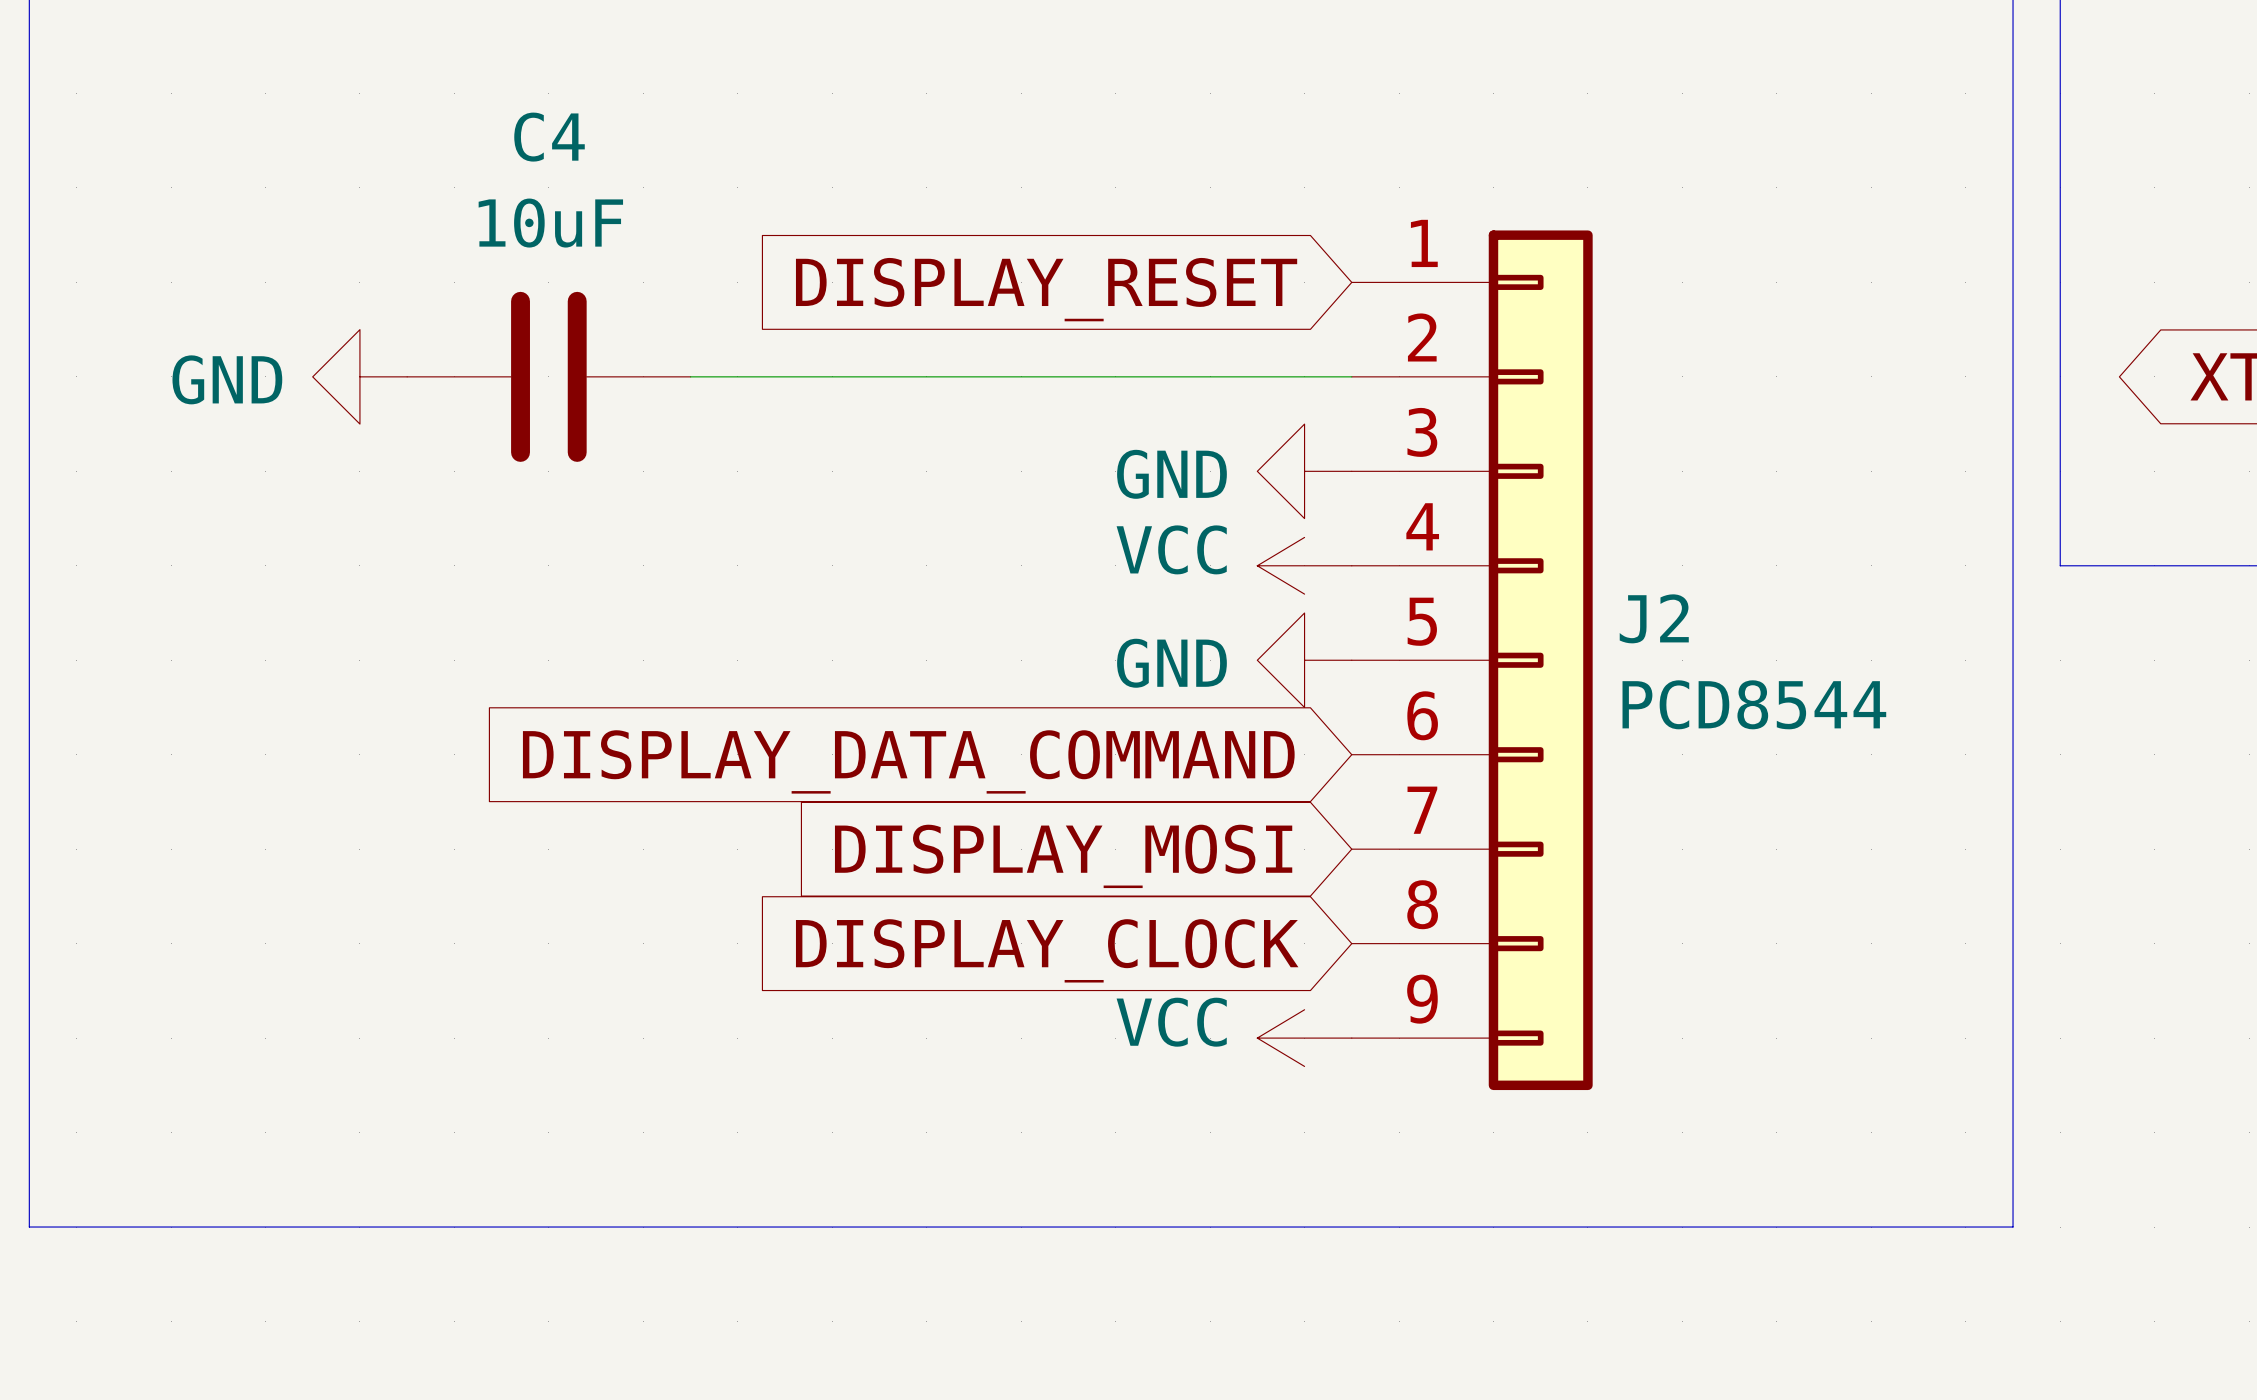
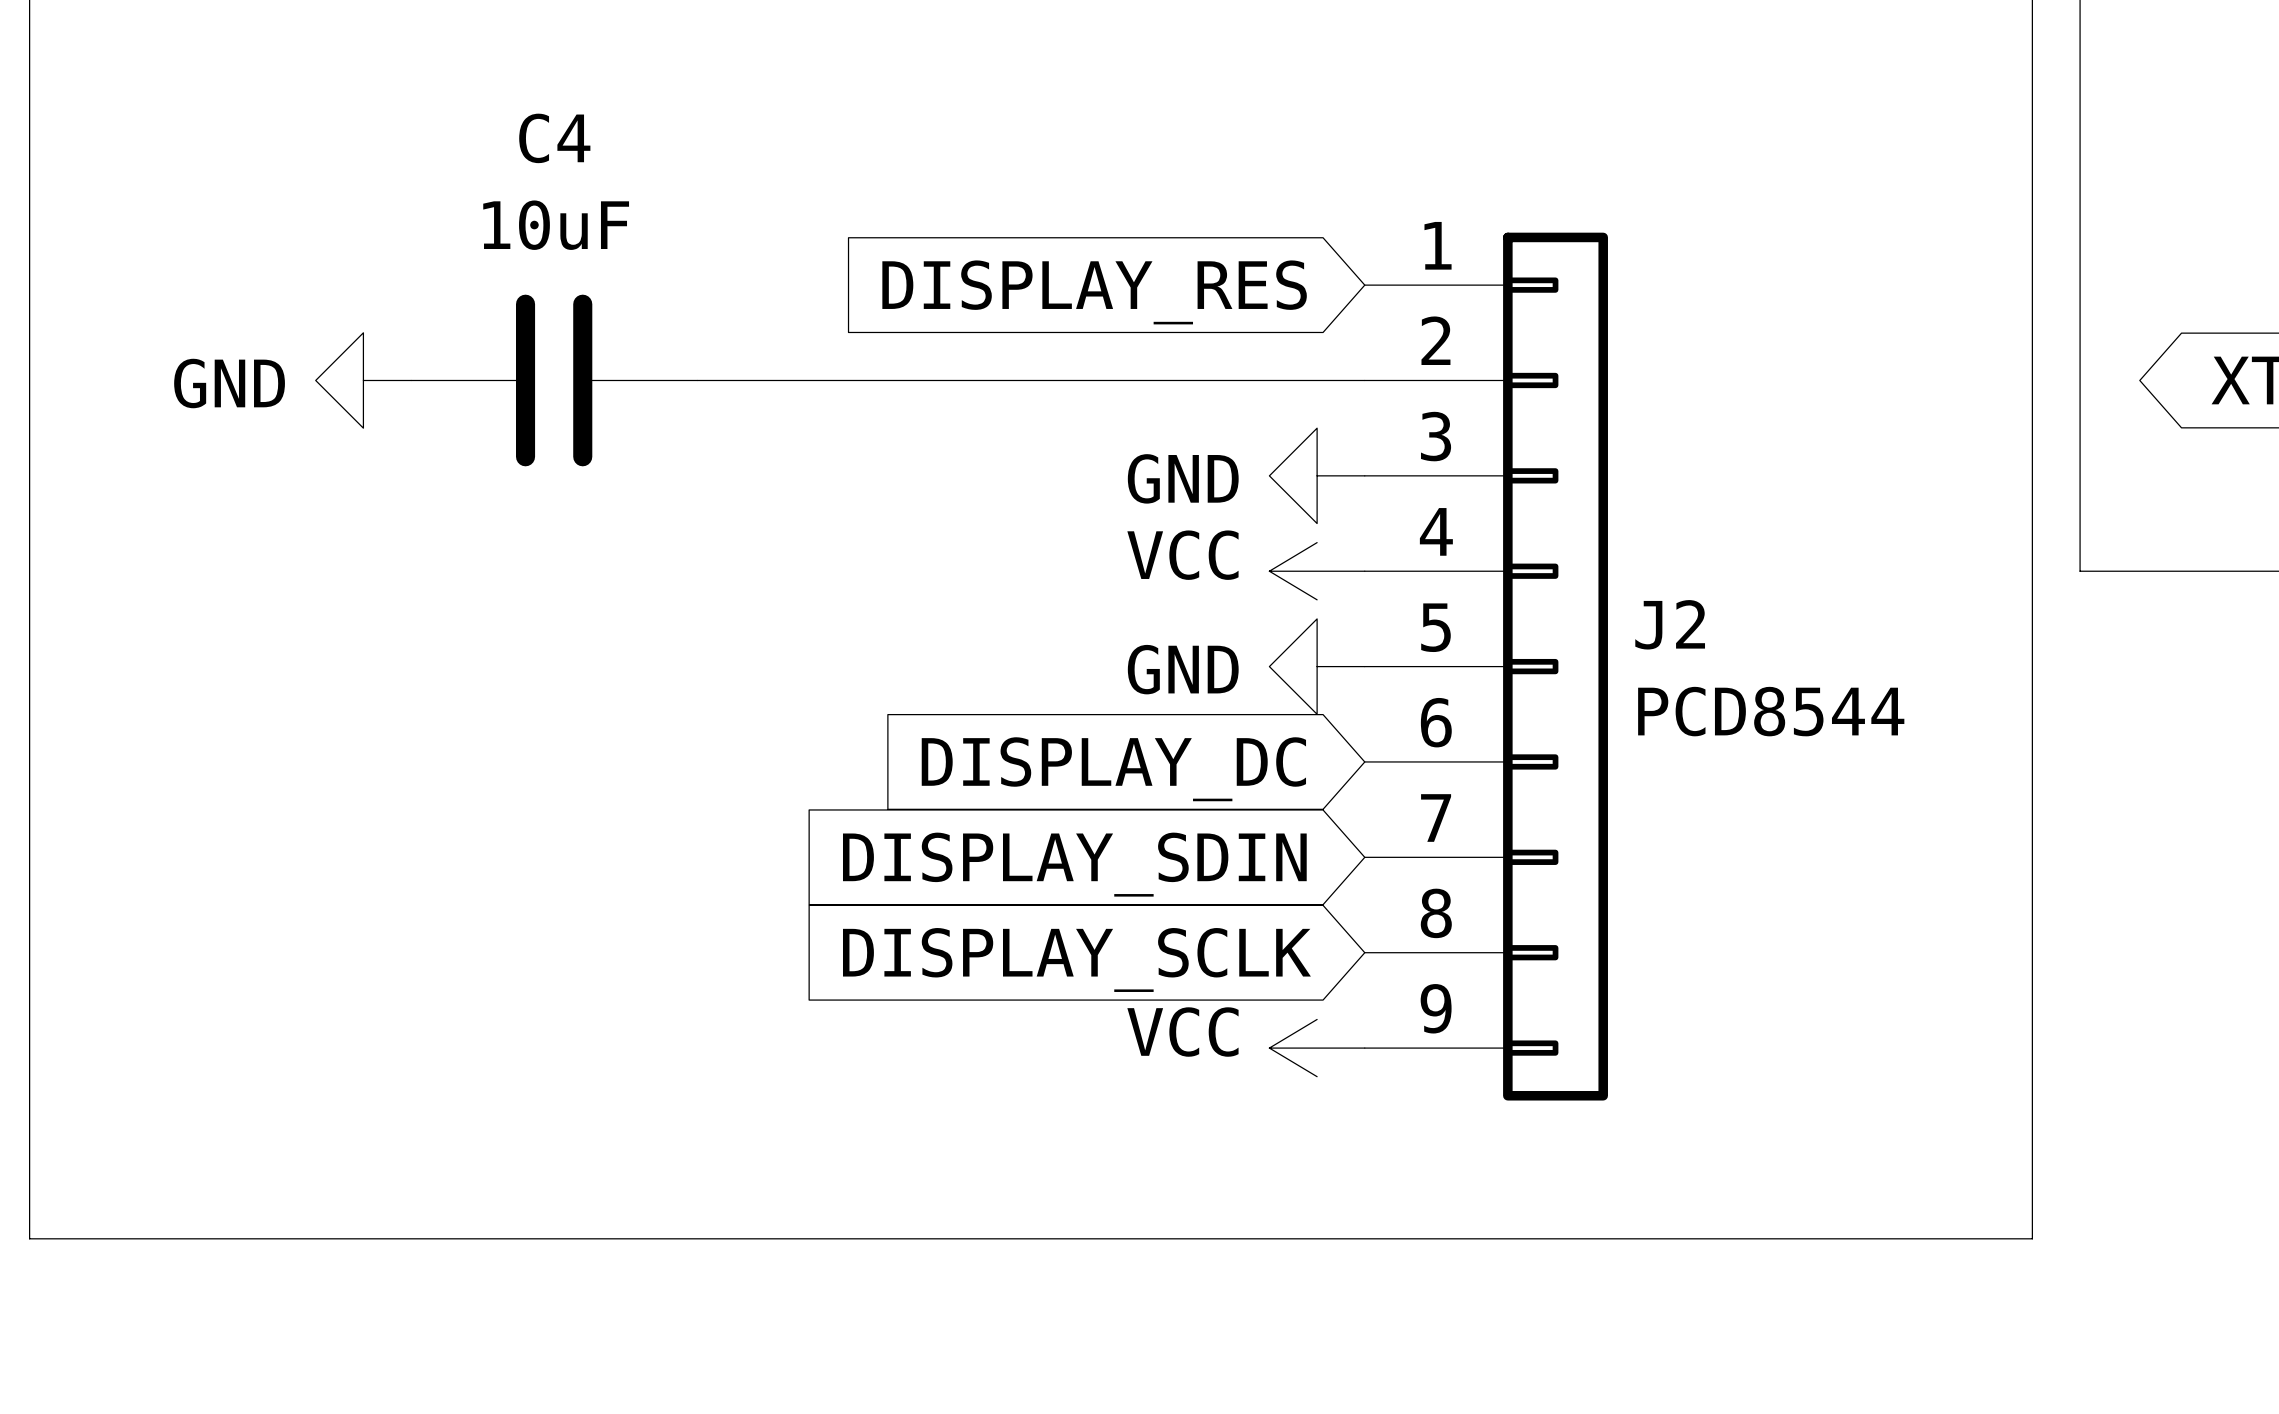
global label: DISPLAY_RESET (1046, 289) -> DISPLAY_RES (1094, 292)
global label: DISPLAY_DATA_COMMAND (908, 761) -> DISPLAY_DC (1113, 769)
global label: DISPLAY_MOSI (1063, 856) -> DISPLAY_SDIN (1074, 864)
global label: DISPLAY_CLOCK (1047, 950) -> DISPLAY_SCLK (1076, 959)

